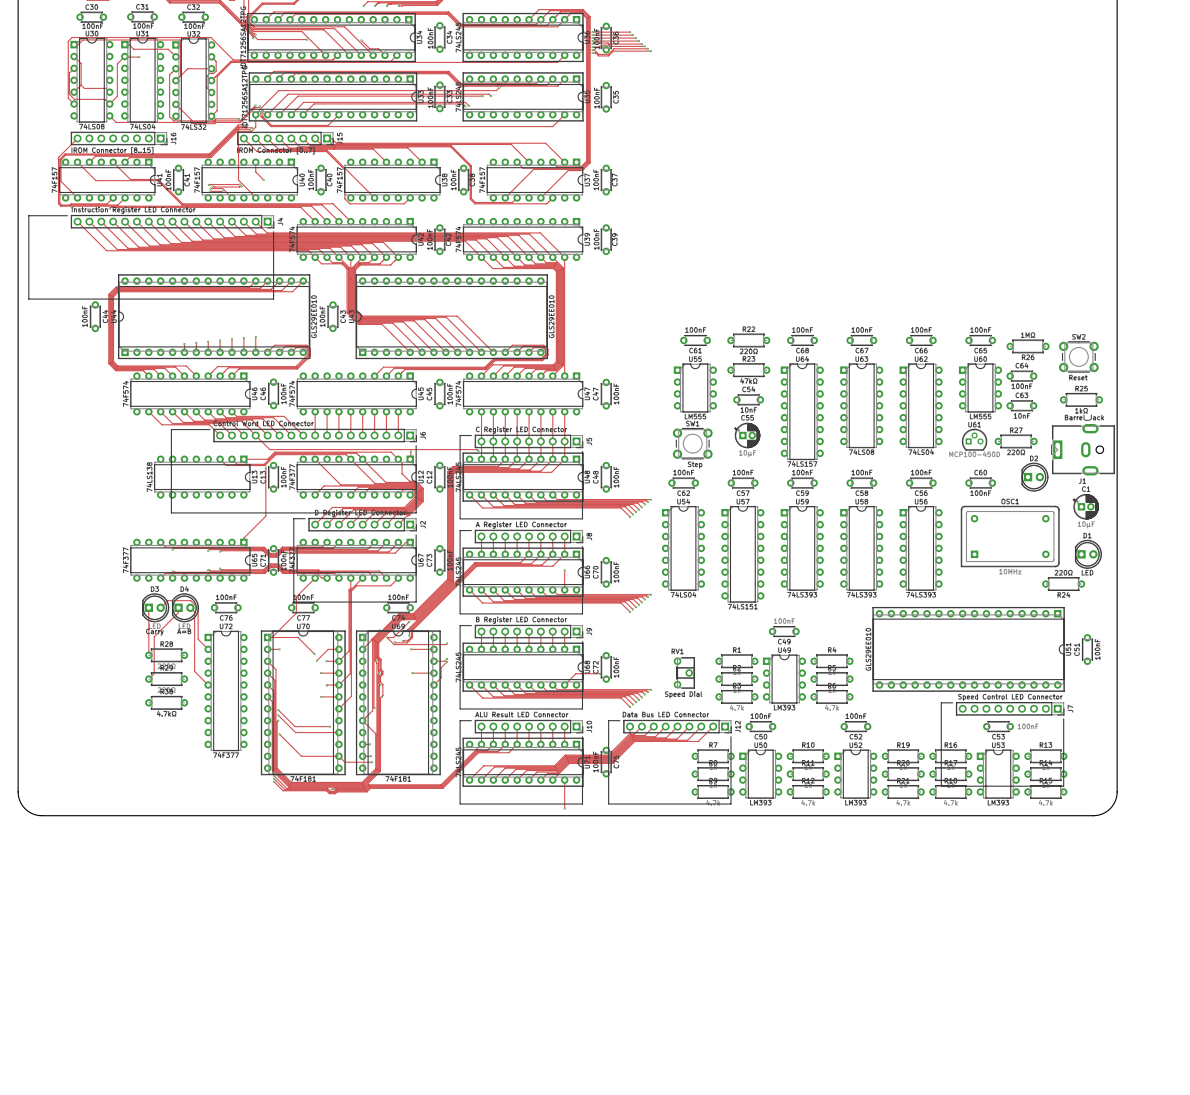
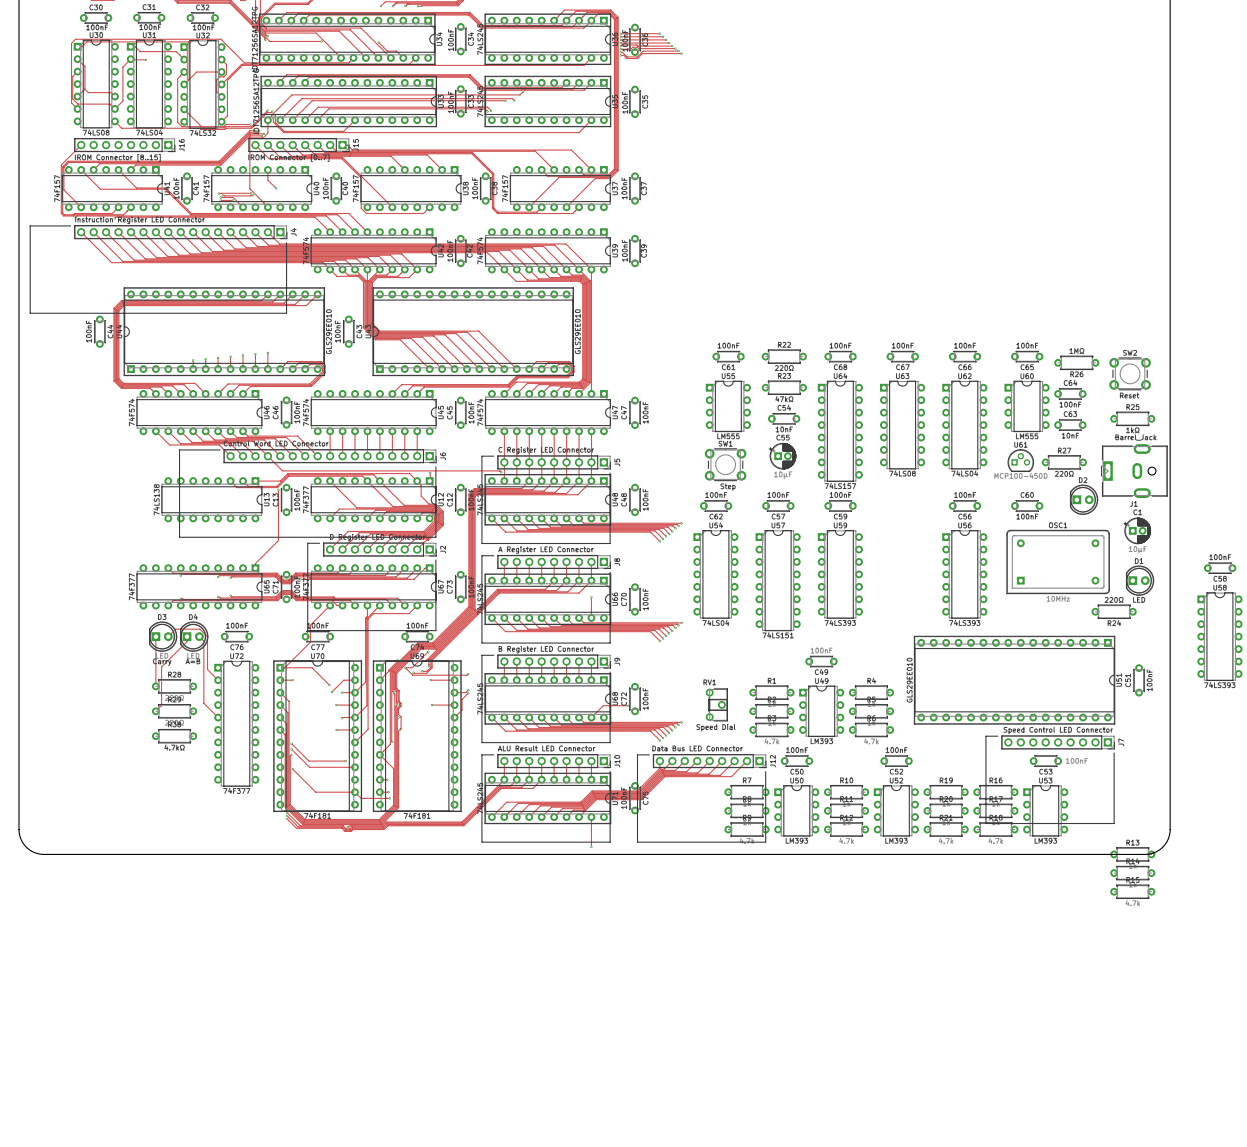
part position: (861, 483) -> (1220, 568)
part position: (861, 548) -> (1219, 636)
part position: (1045, 756) -> (1132, 854)
part position: (1045, 774) -> (1132, 873)
part position: (1045, 791) -> (1132, 891)

